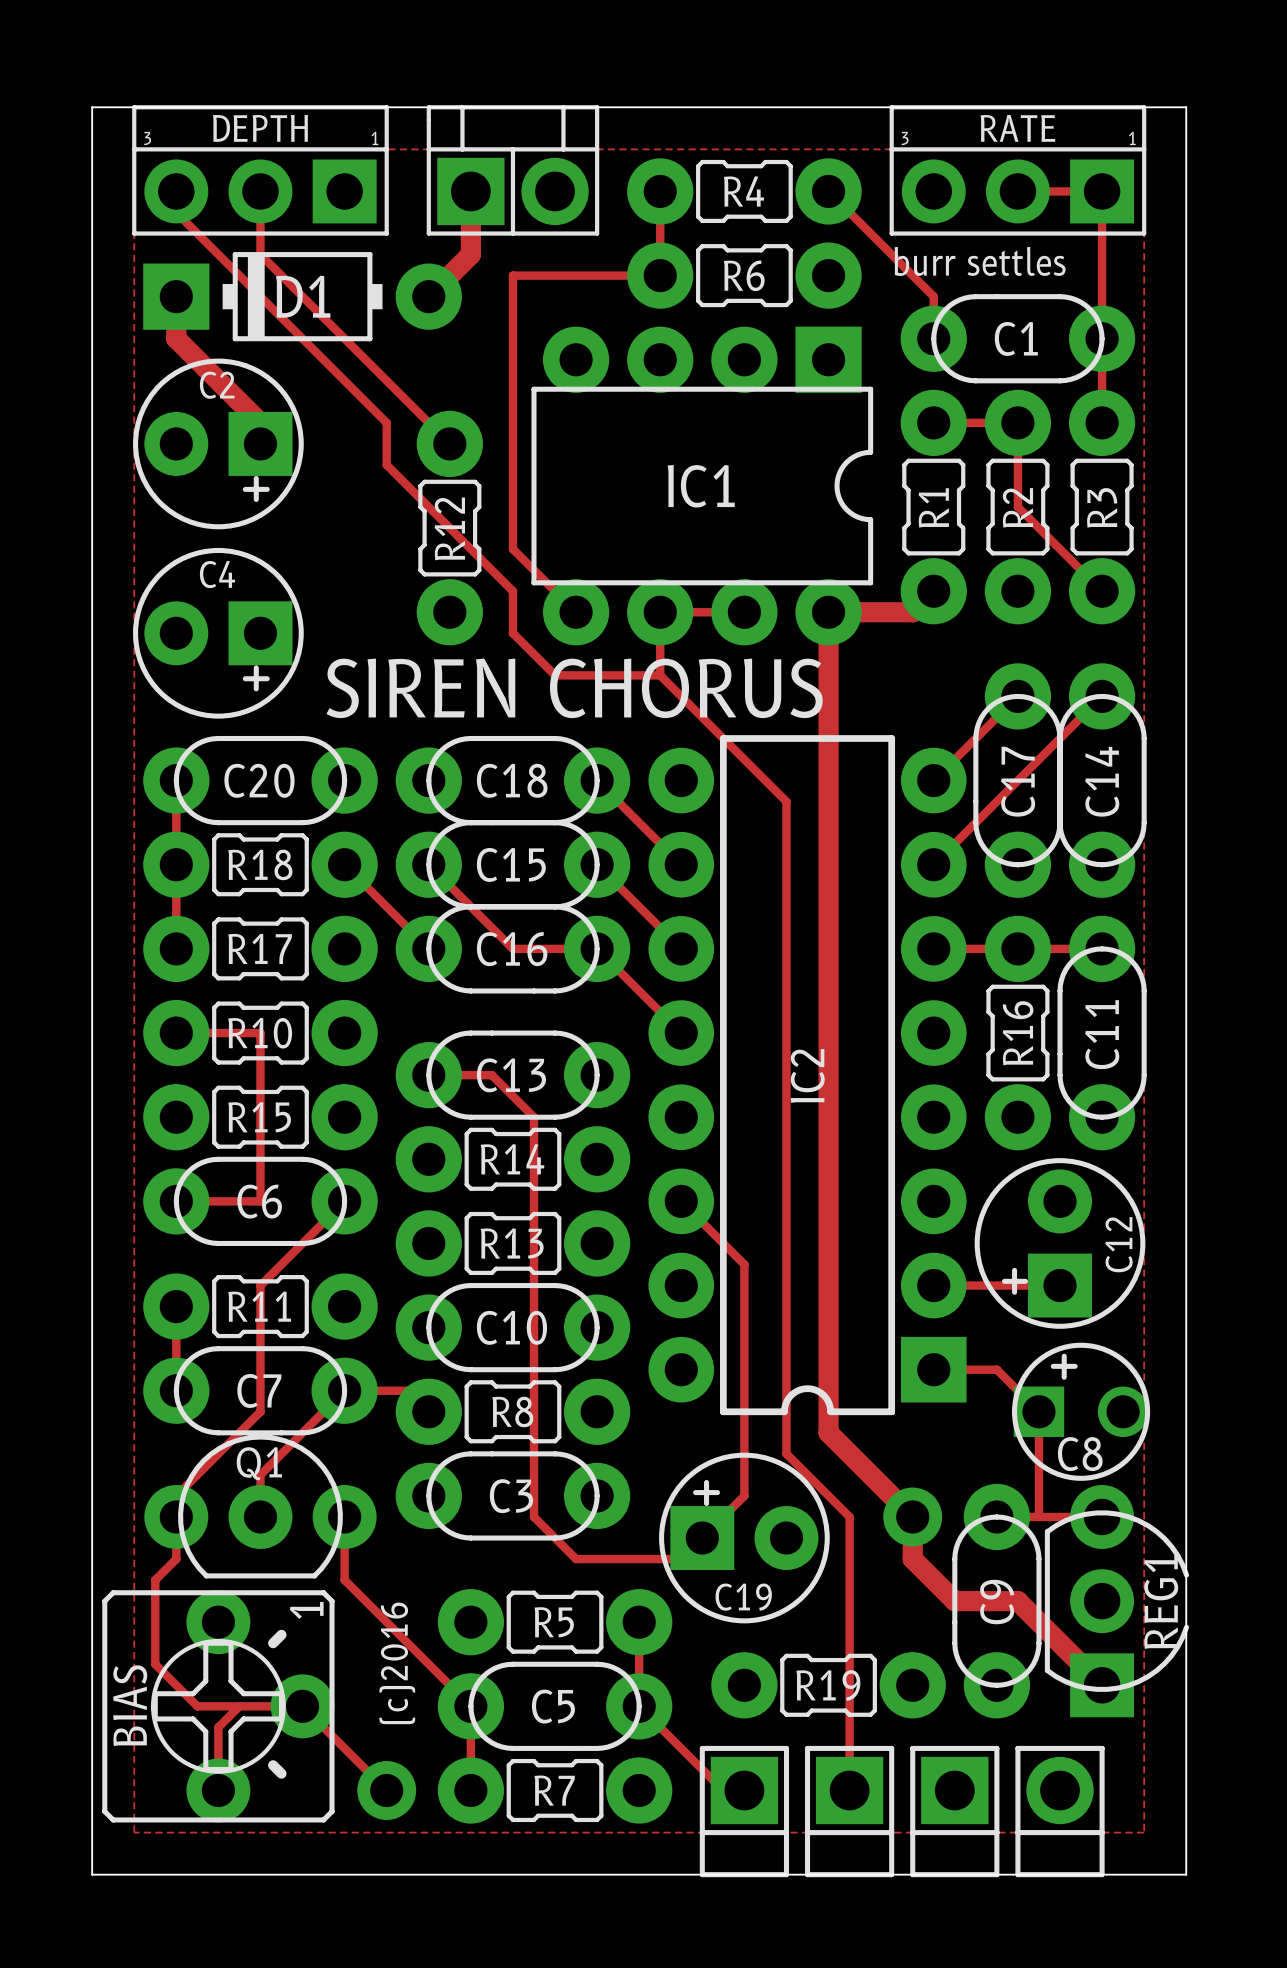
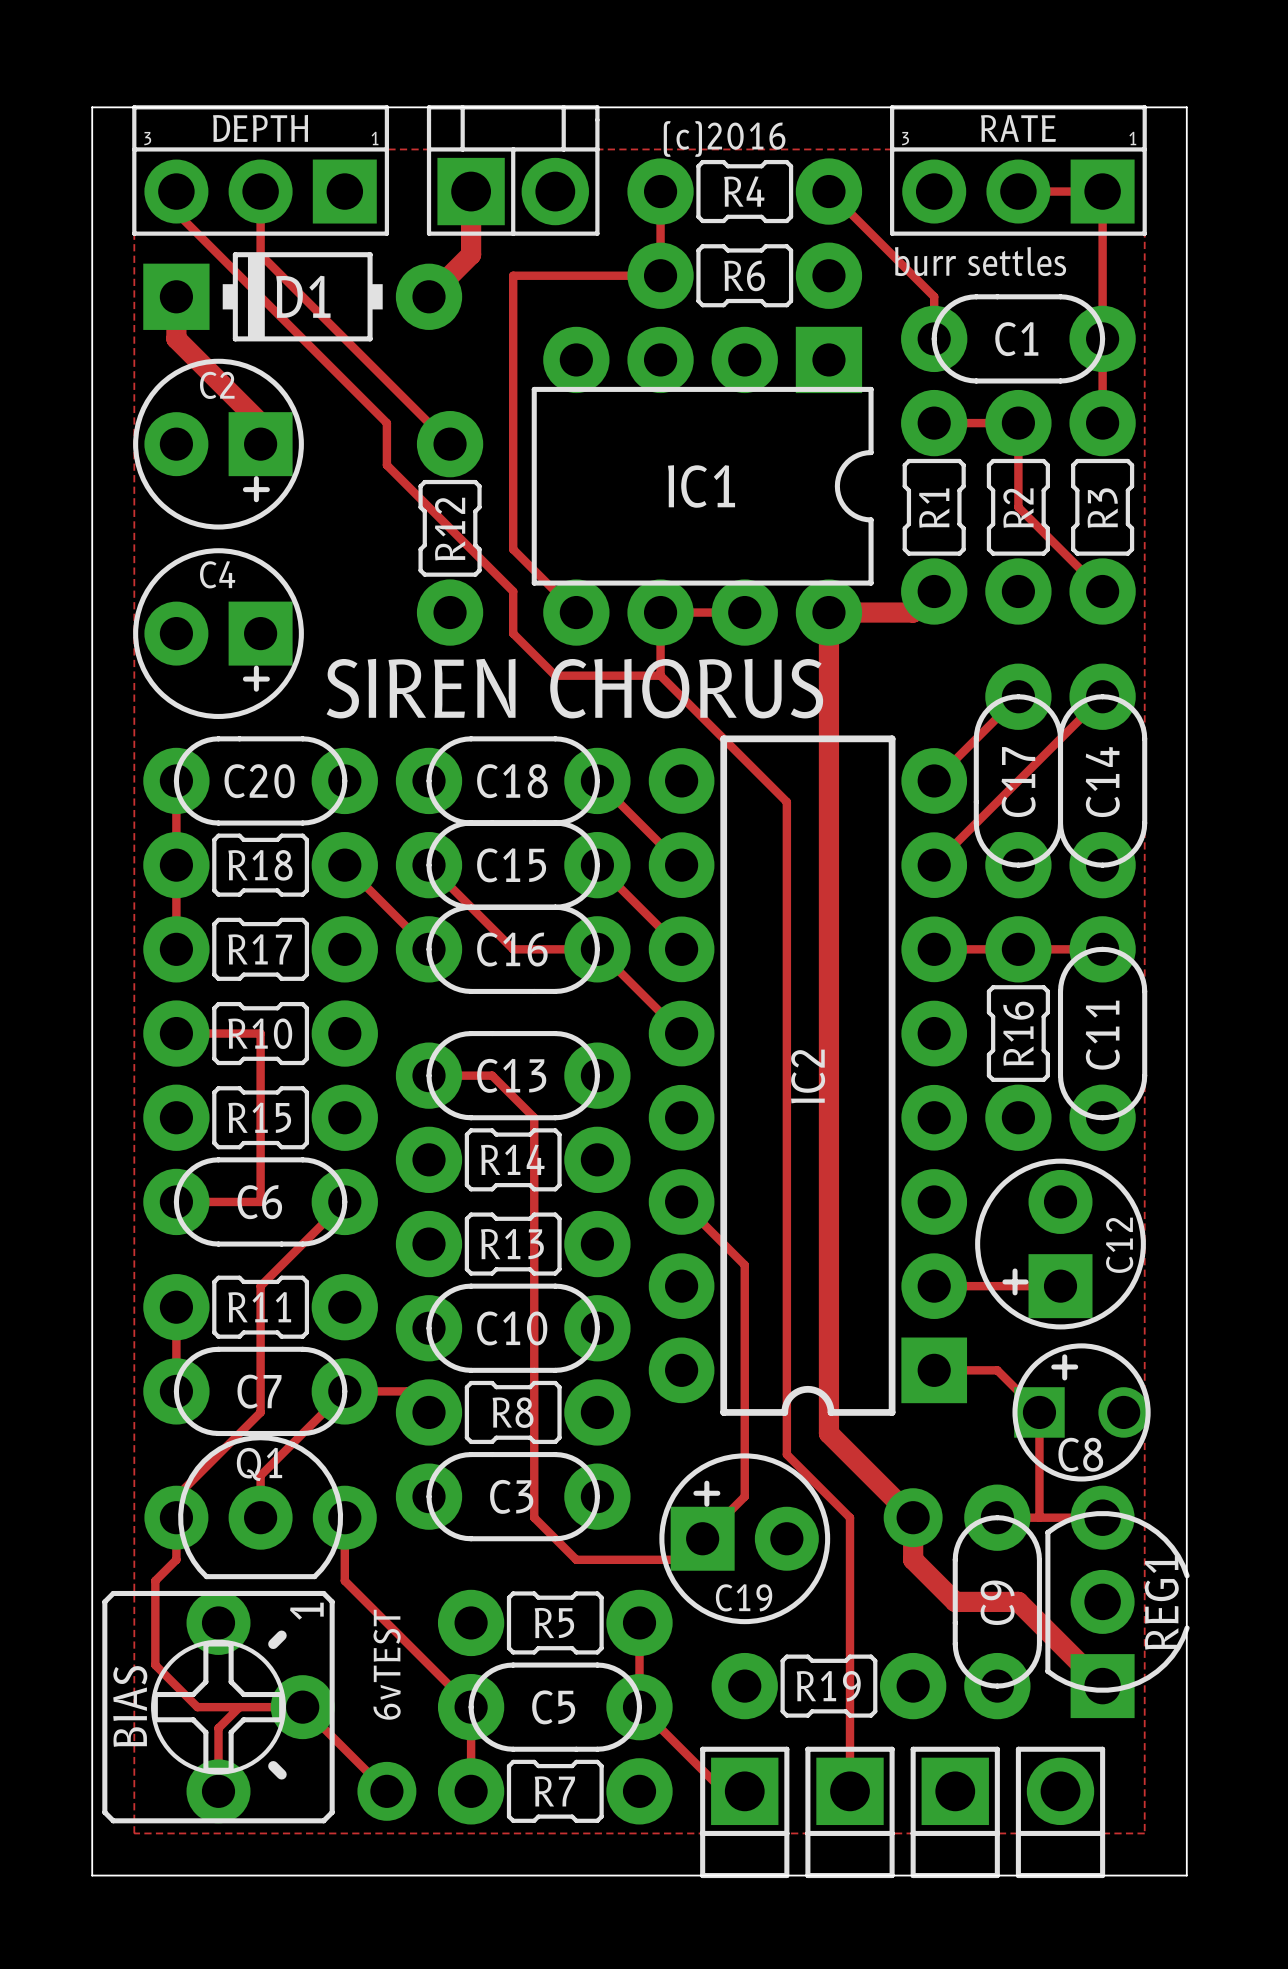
text: none -> (c)2016 (724, 138)
text: none -> 6vTEST (387, 1664)
text: (c)2016 (397, 1663) -> none

